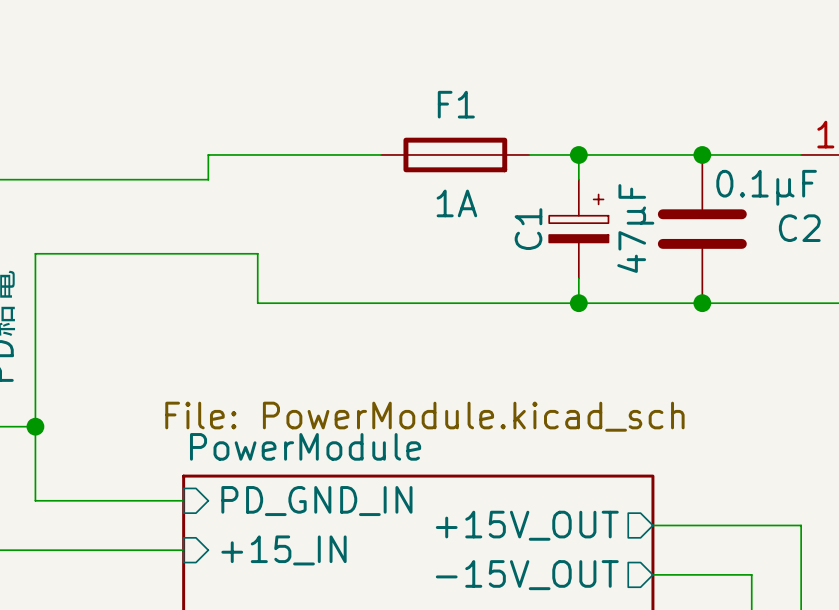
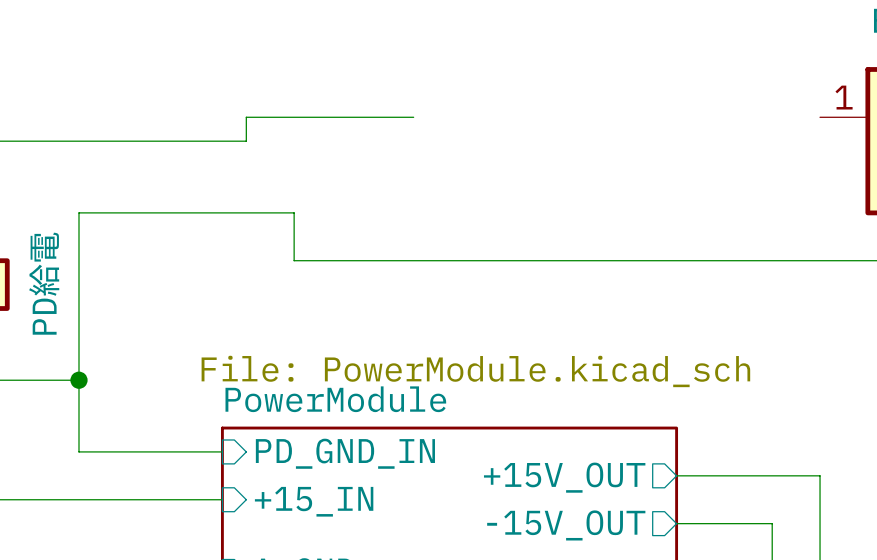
F1: 1A (455, 154) -> none
wire: (529, 154) (801, 154) -> none
wire: (578, 154) (578, 179) -> none
junction: (578, 154) -> none
junction: (702, 154) -> none
C1: 47μF (578, 229) -> none
C2: 0.1μF (702, 229) -> none
wire: (578, 278) (578, 303) -> none
junction: (578, 303) -> none
junction: (702, 303) -> none

